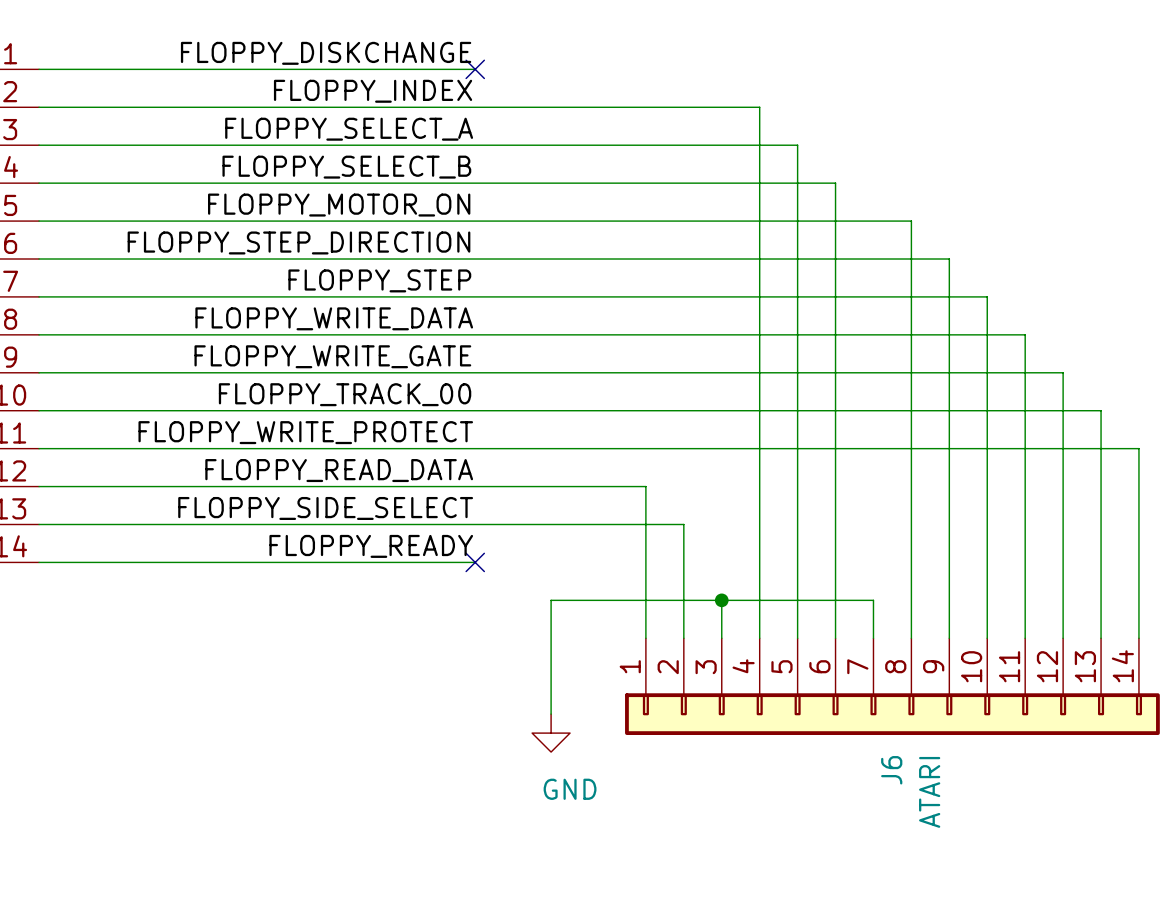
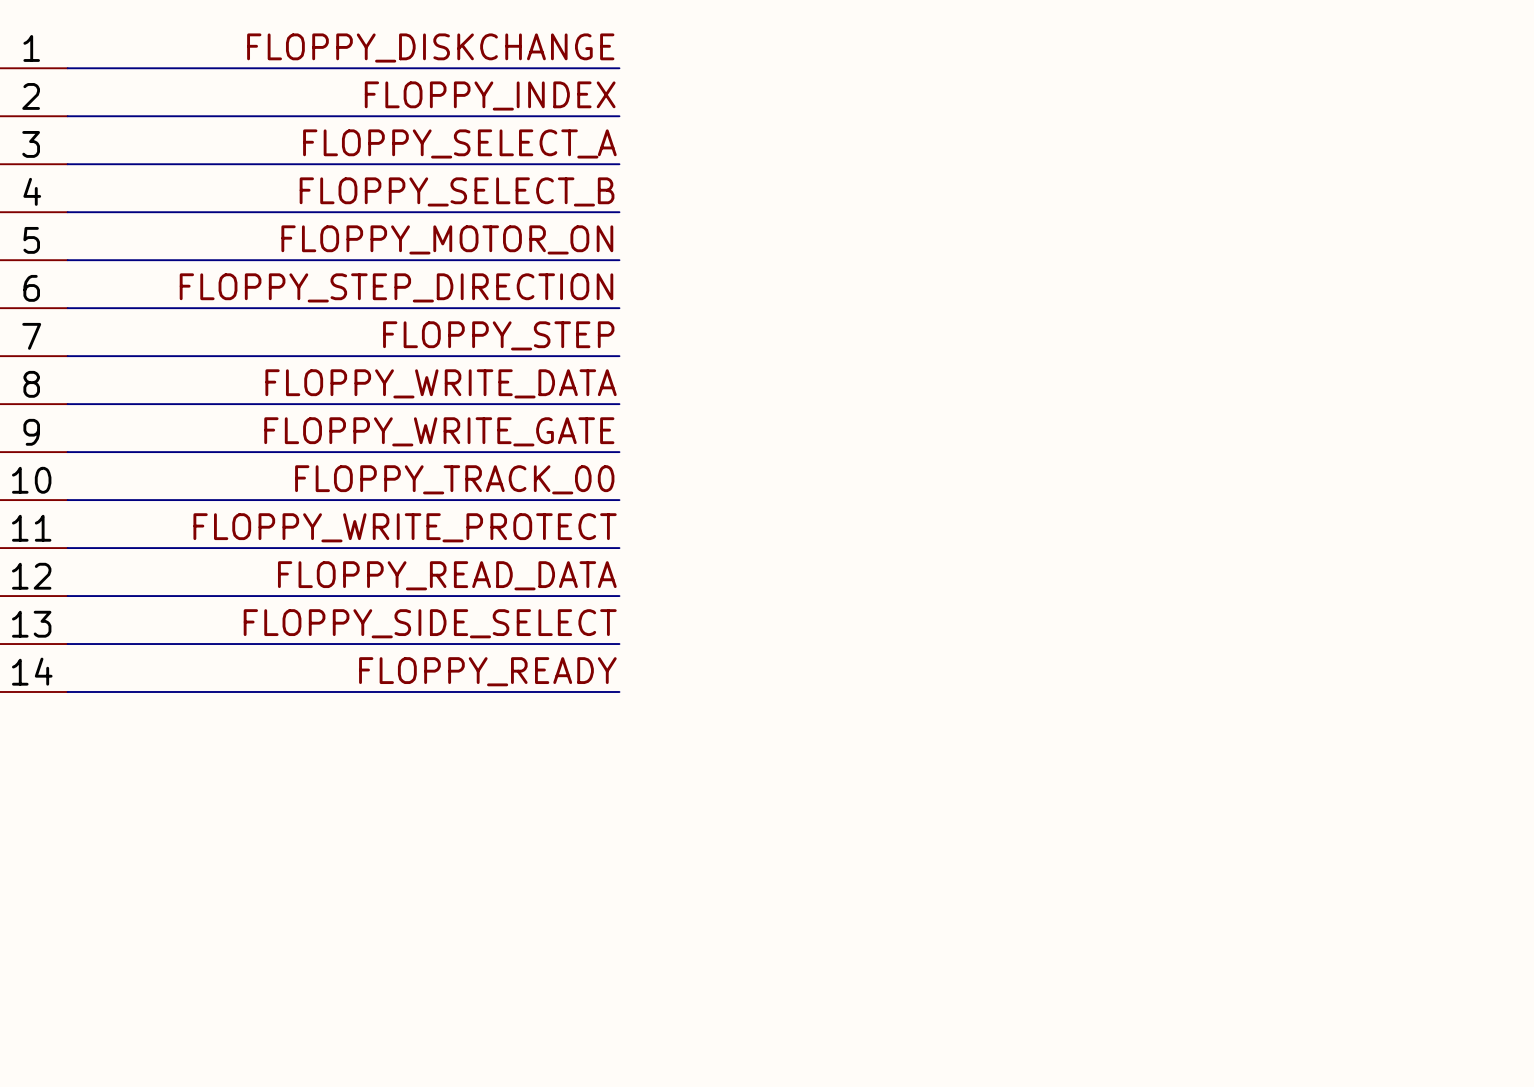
no-connect mark: (475, 69) -> none
wire: (475, 107) (759, 107) (759, 638) -> none
wire: (475, 145) (797, 145) (797, 638) -> none
wire: (475, 183) (835, 183) (835, 638) -> none
wire: (475, 221) (911, 221) (911, 638) -> none
wire: (475, 259) (949, 259) (949, 638) -> none
wire: (475, 296) (987, 296) (987, 638) -> none
wire: (475, 334) (1025, 334) (1025, 638) -> none
wire: (475, 372) (1063, 372) (1063, 638) -> none
wire: (475, 410) (1101, 410) (1101, 638) -> none
wire: (475, 448) (1138, 448) (1138, 638) -> none
wire: (475, 486) (645, 486) (645, 638) -> none
wire: (475, 524) (683, 524) (683, 638) -> none
no-connect mark: (475, 562) -> none
wire: (721, 600) (721, 638) -> none
junction: (721, 600) -> none
wire: (873, 638) (873, 600) (551, 600) (551, 714) -> none
J6: ATARI (892, 686) -> none
power symbol: GND (551, 733) -> none

